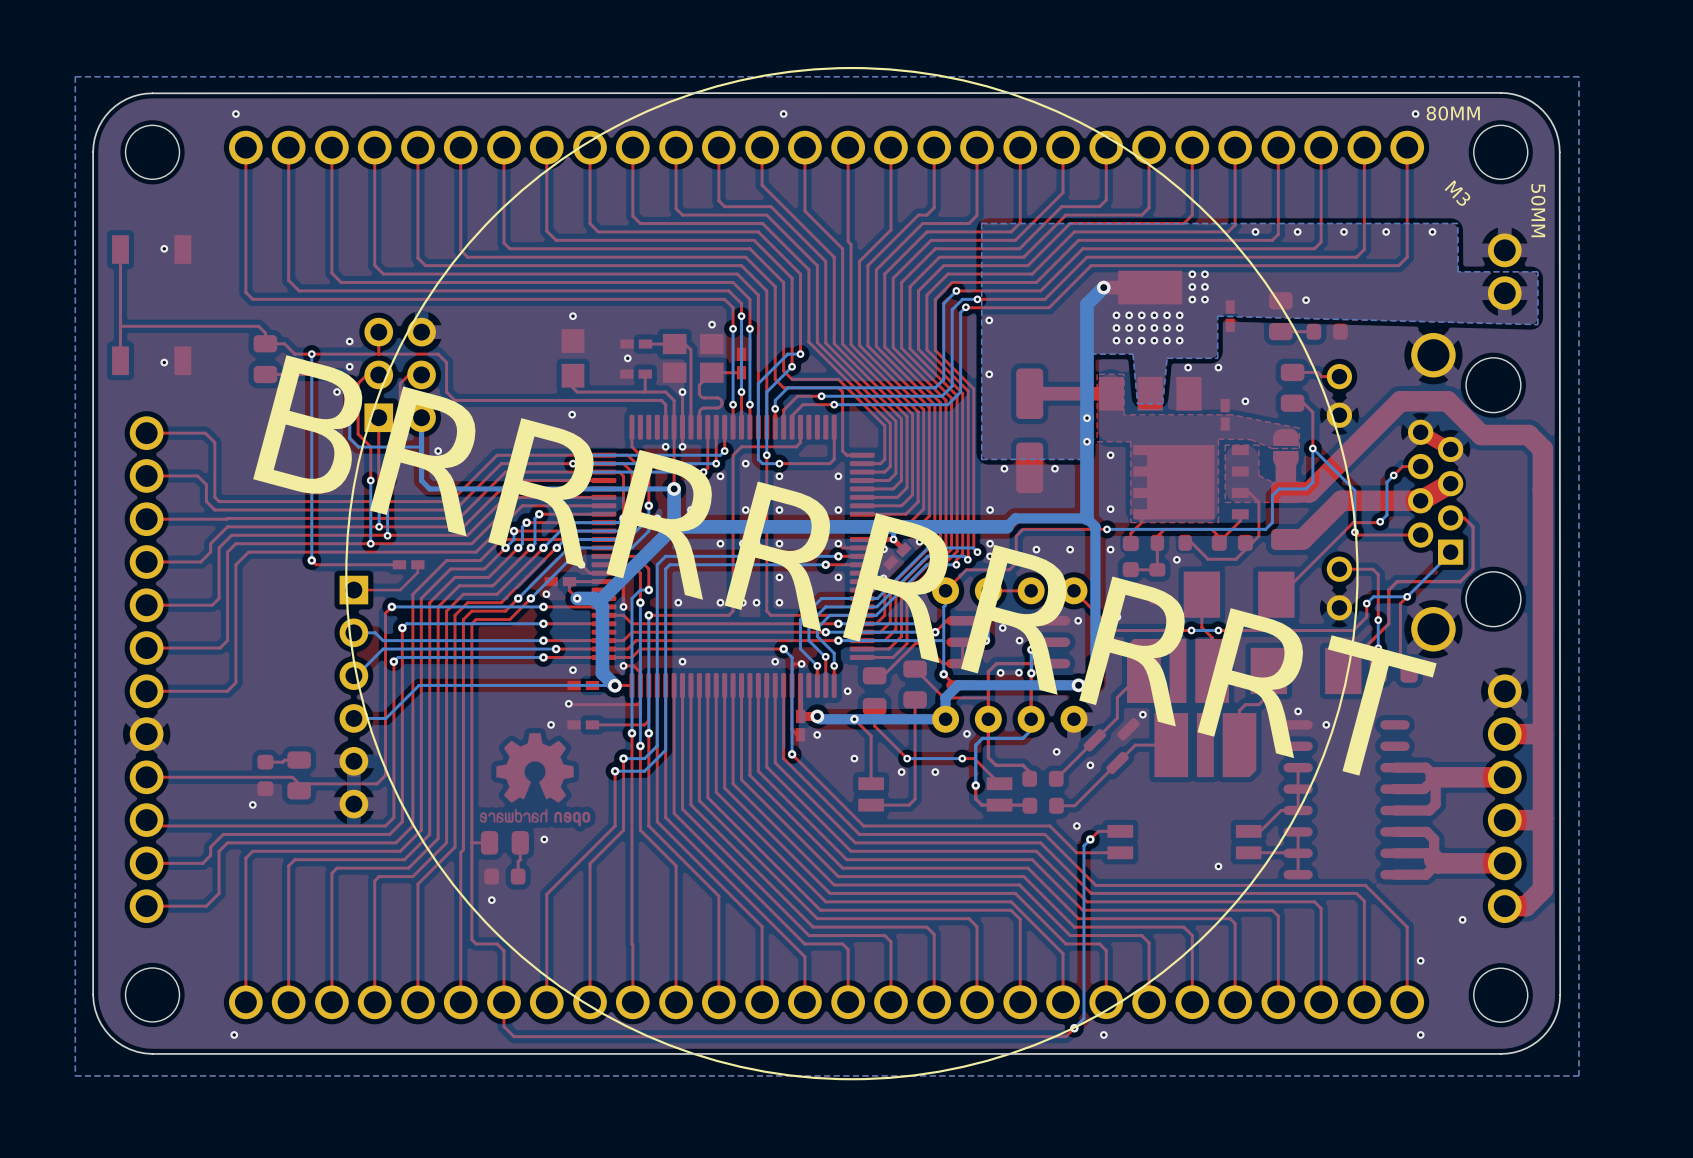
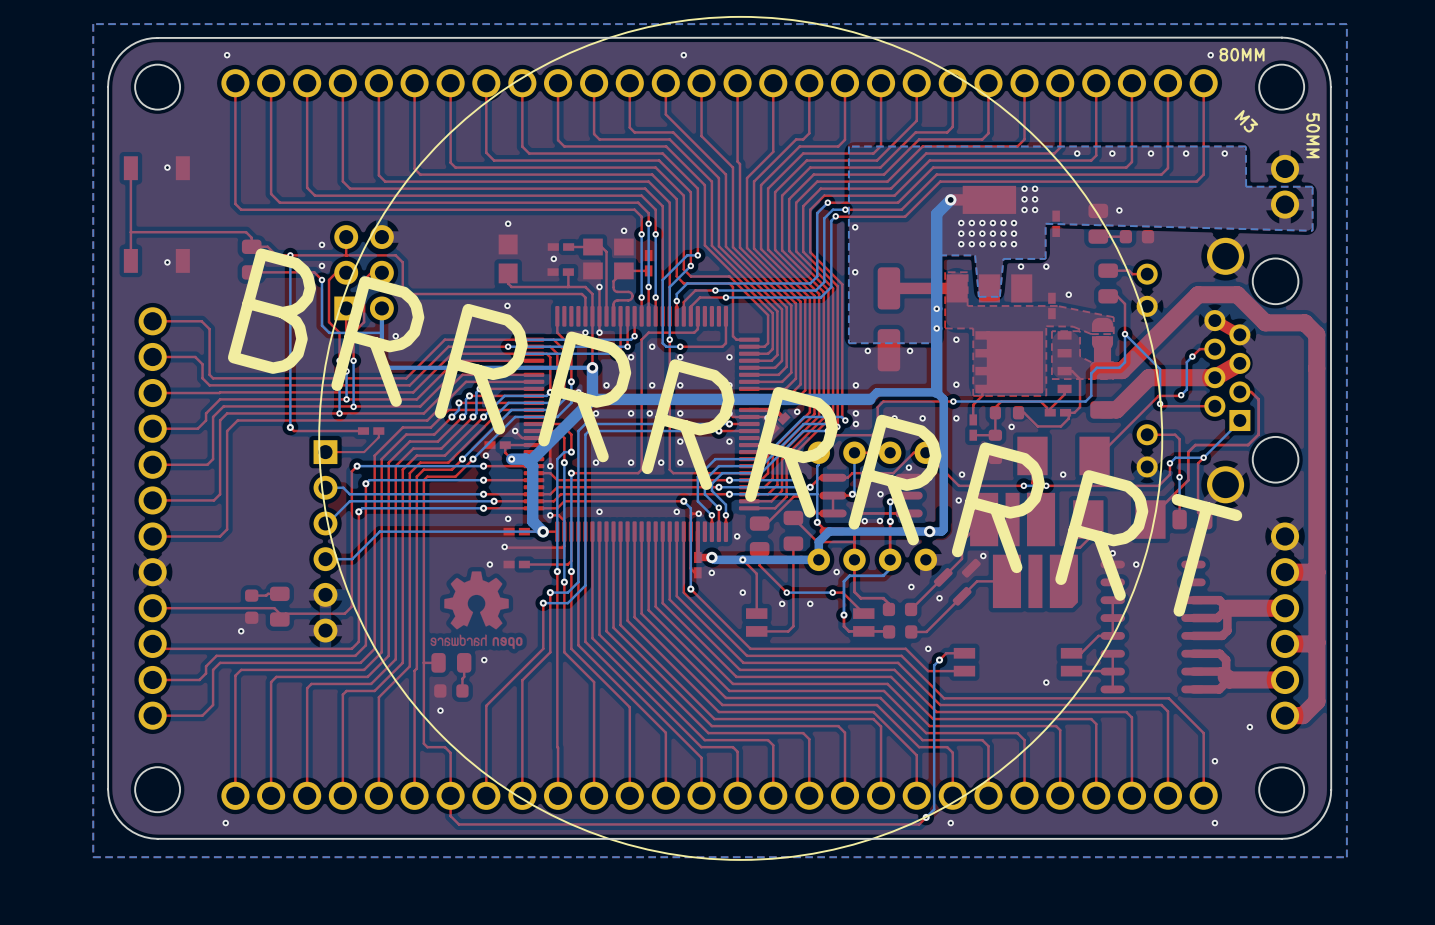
part footprint: [1211, 534, 1254, 551] -> [1044, 408, 1072, 417]
part footprint: [1122, 535, 1139, 578] -> [969, 414, 978, 441]

